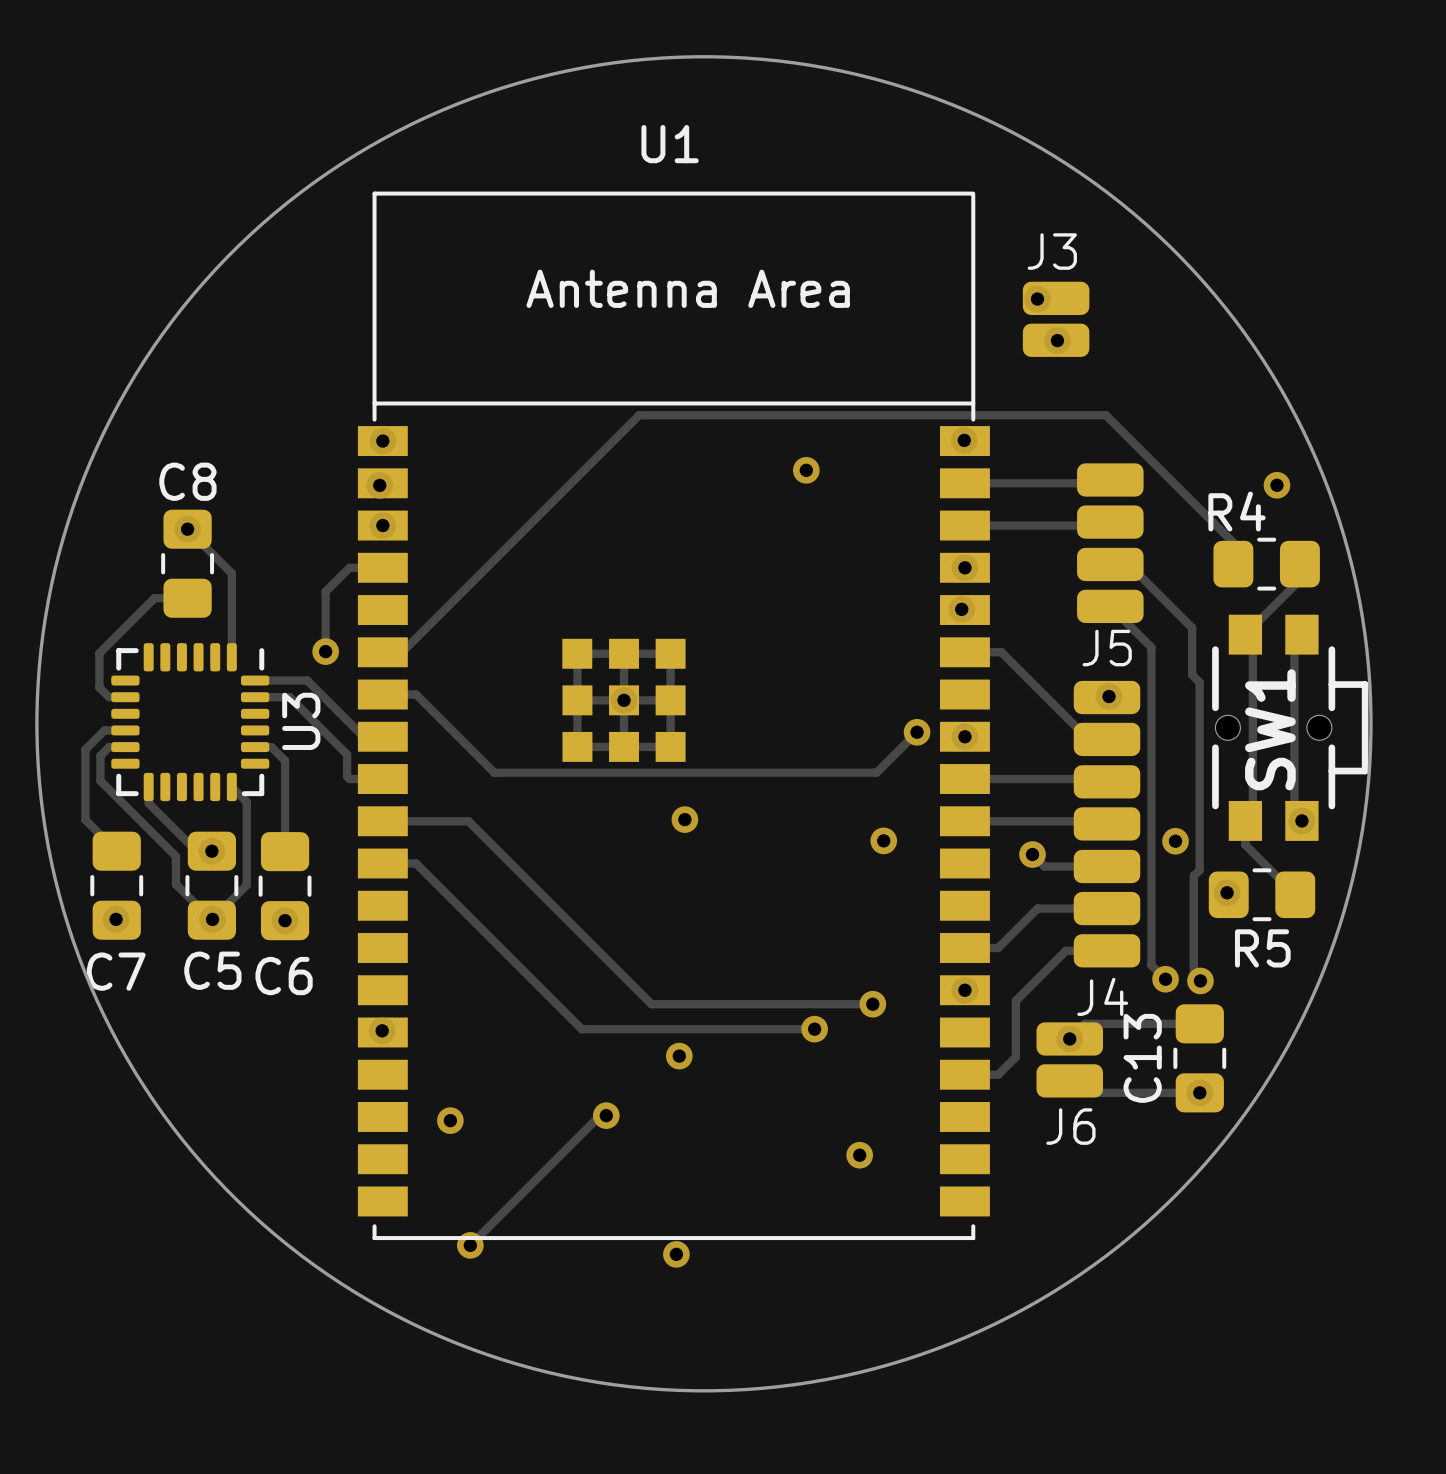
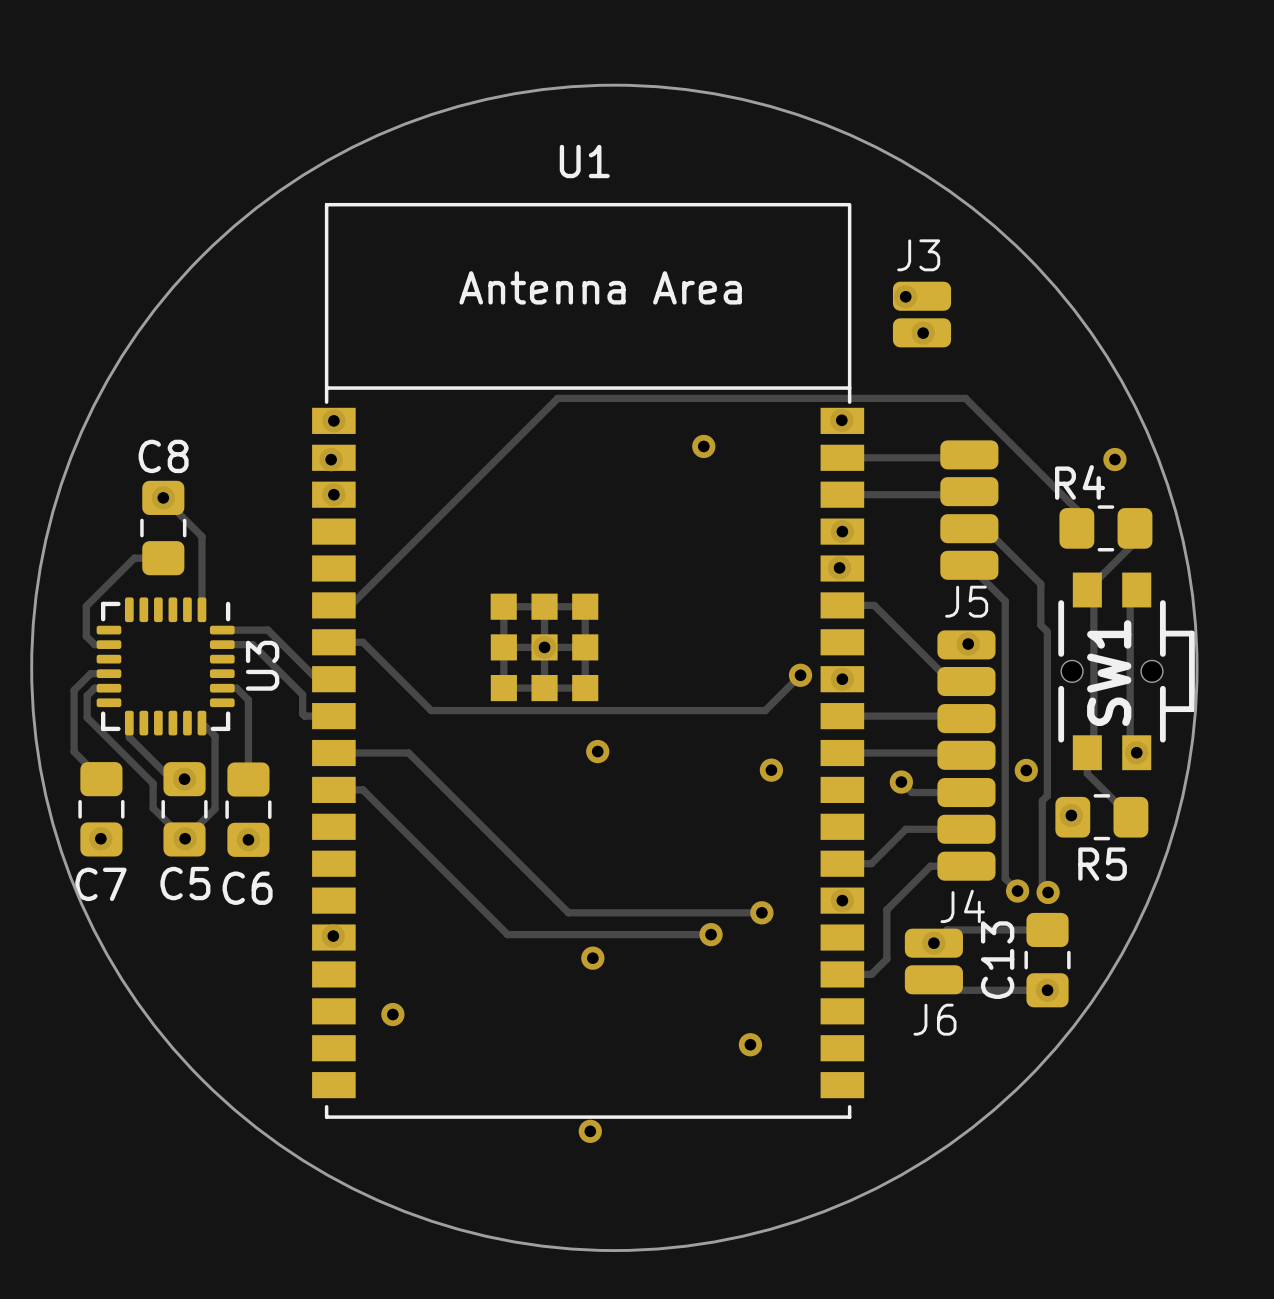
track: (382, 567) (349, 567) (325, 591) (325, 651) -> none
via: (325, 651) -> none
track: (606, 1115) (600, 1115) (470, 1245) -> none
via: (606, 1115) -> none
via: (470, 1245) -> none

